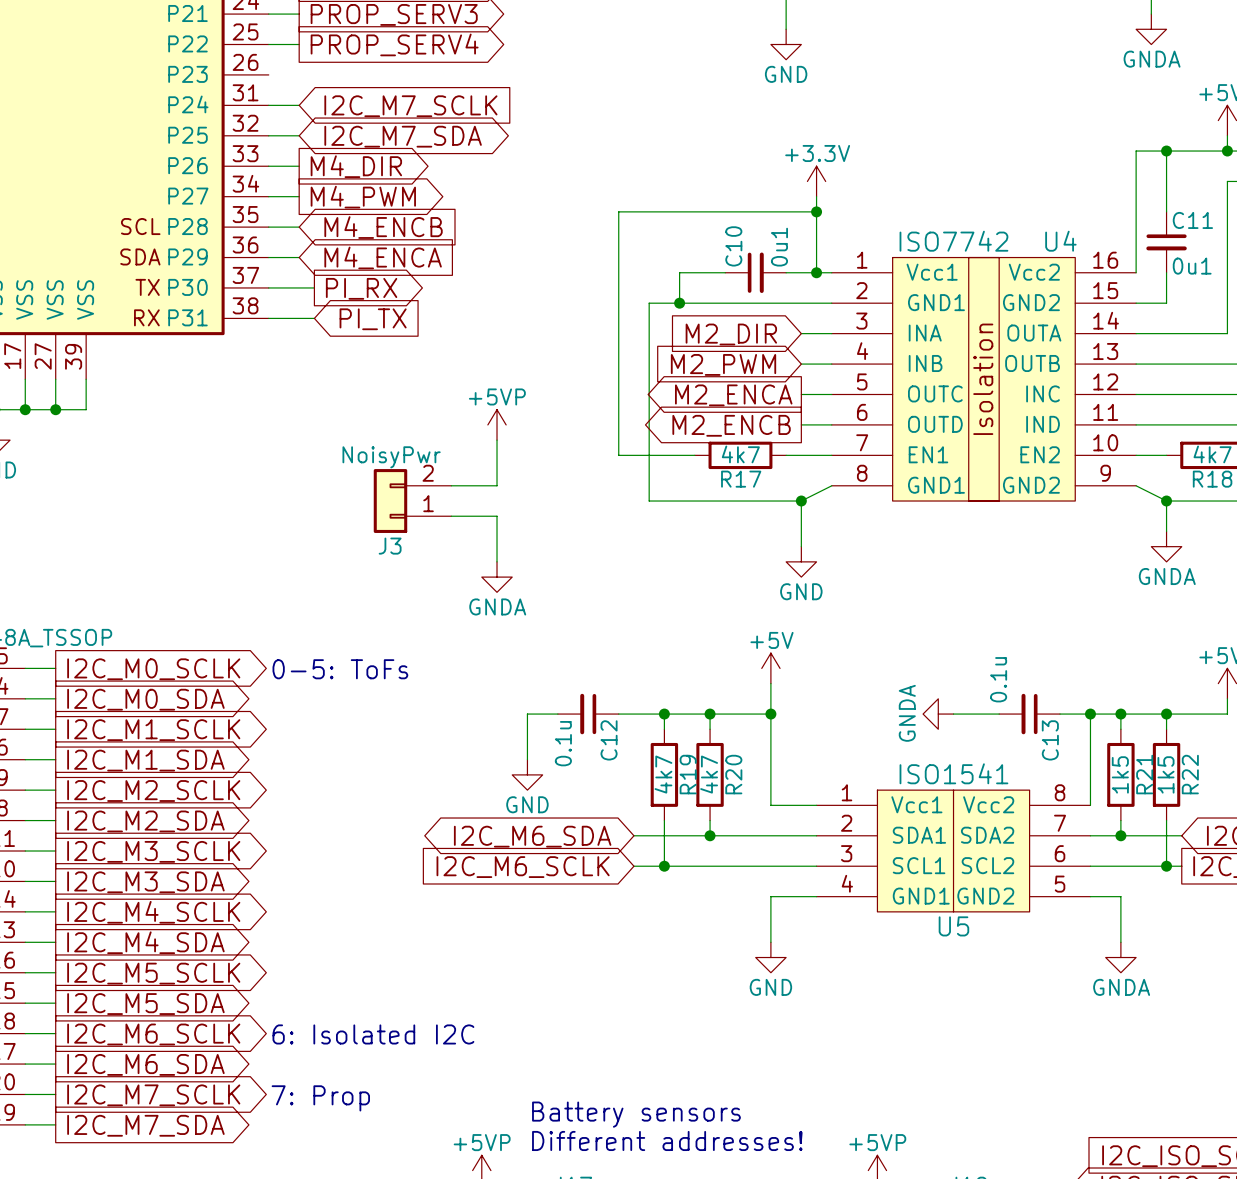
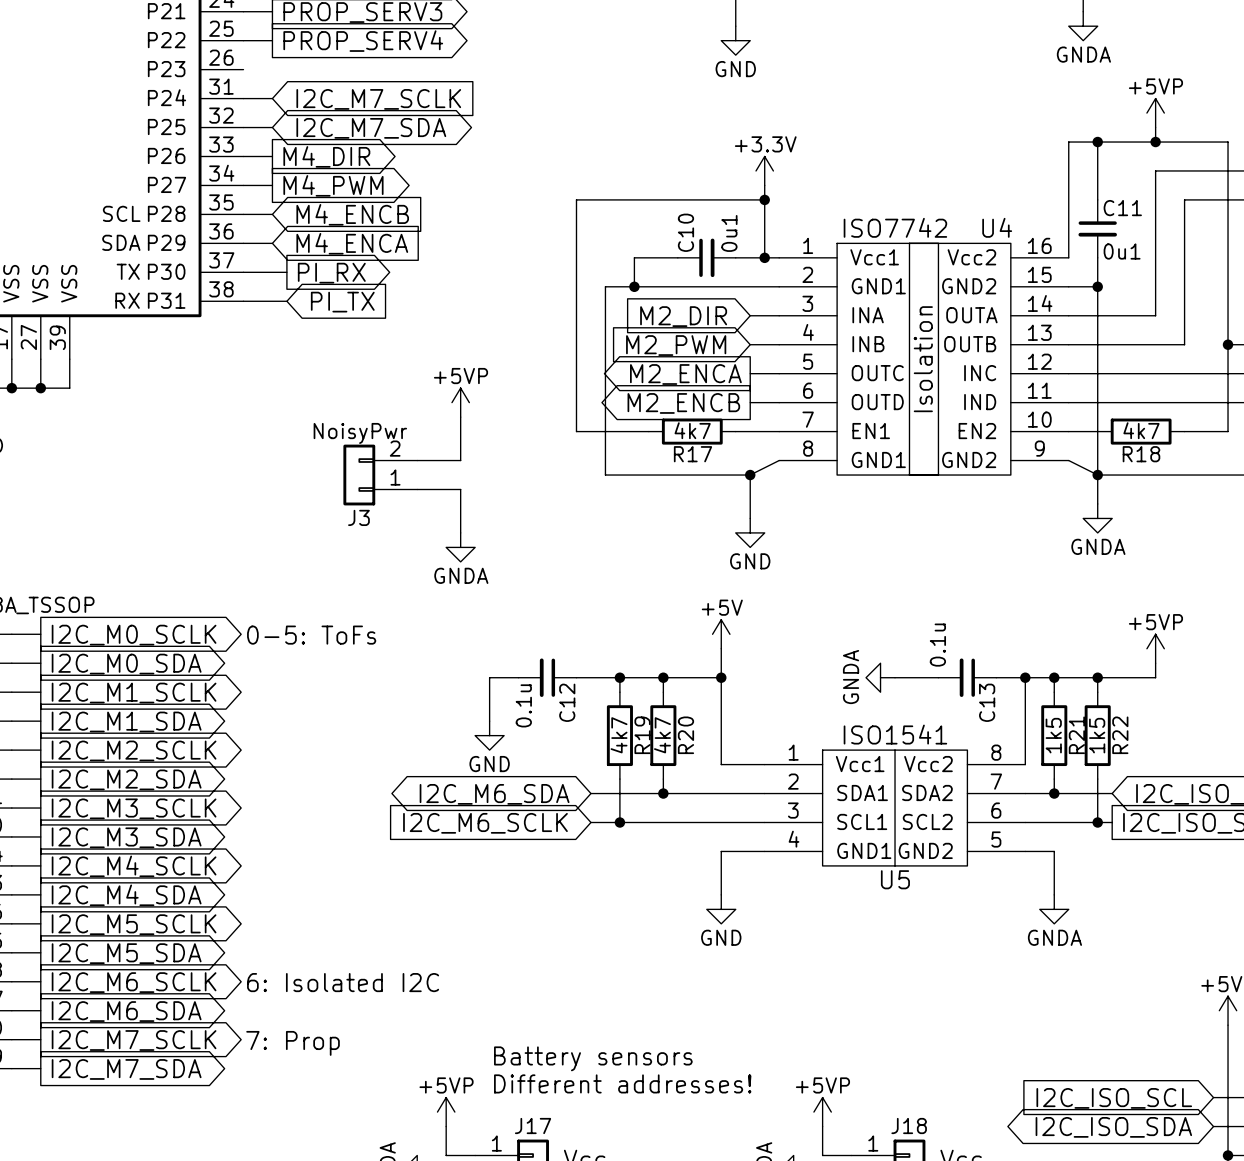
wire: none -> (1097, 286) (1097, 475)
junction: none -> (1097, 286)

